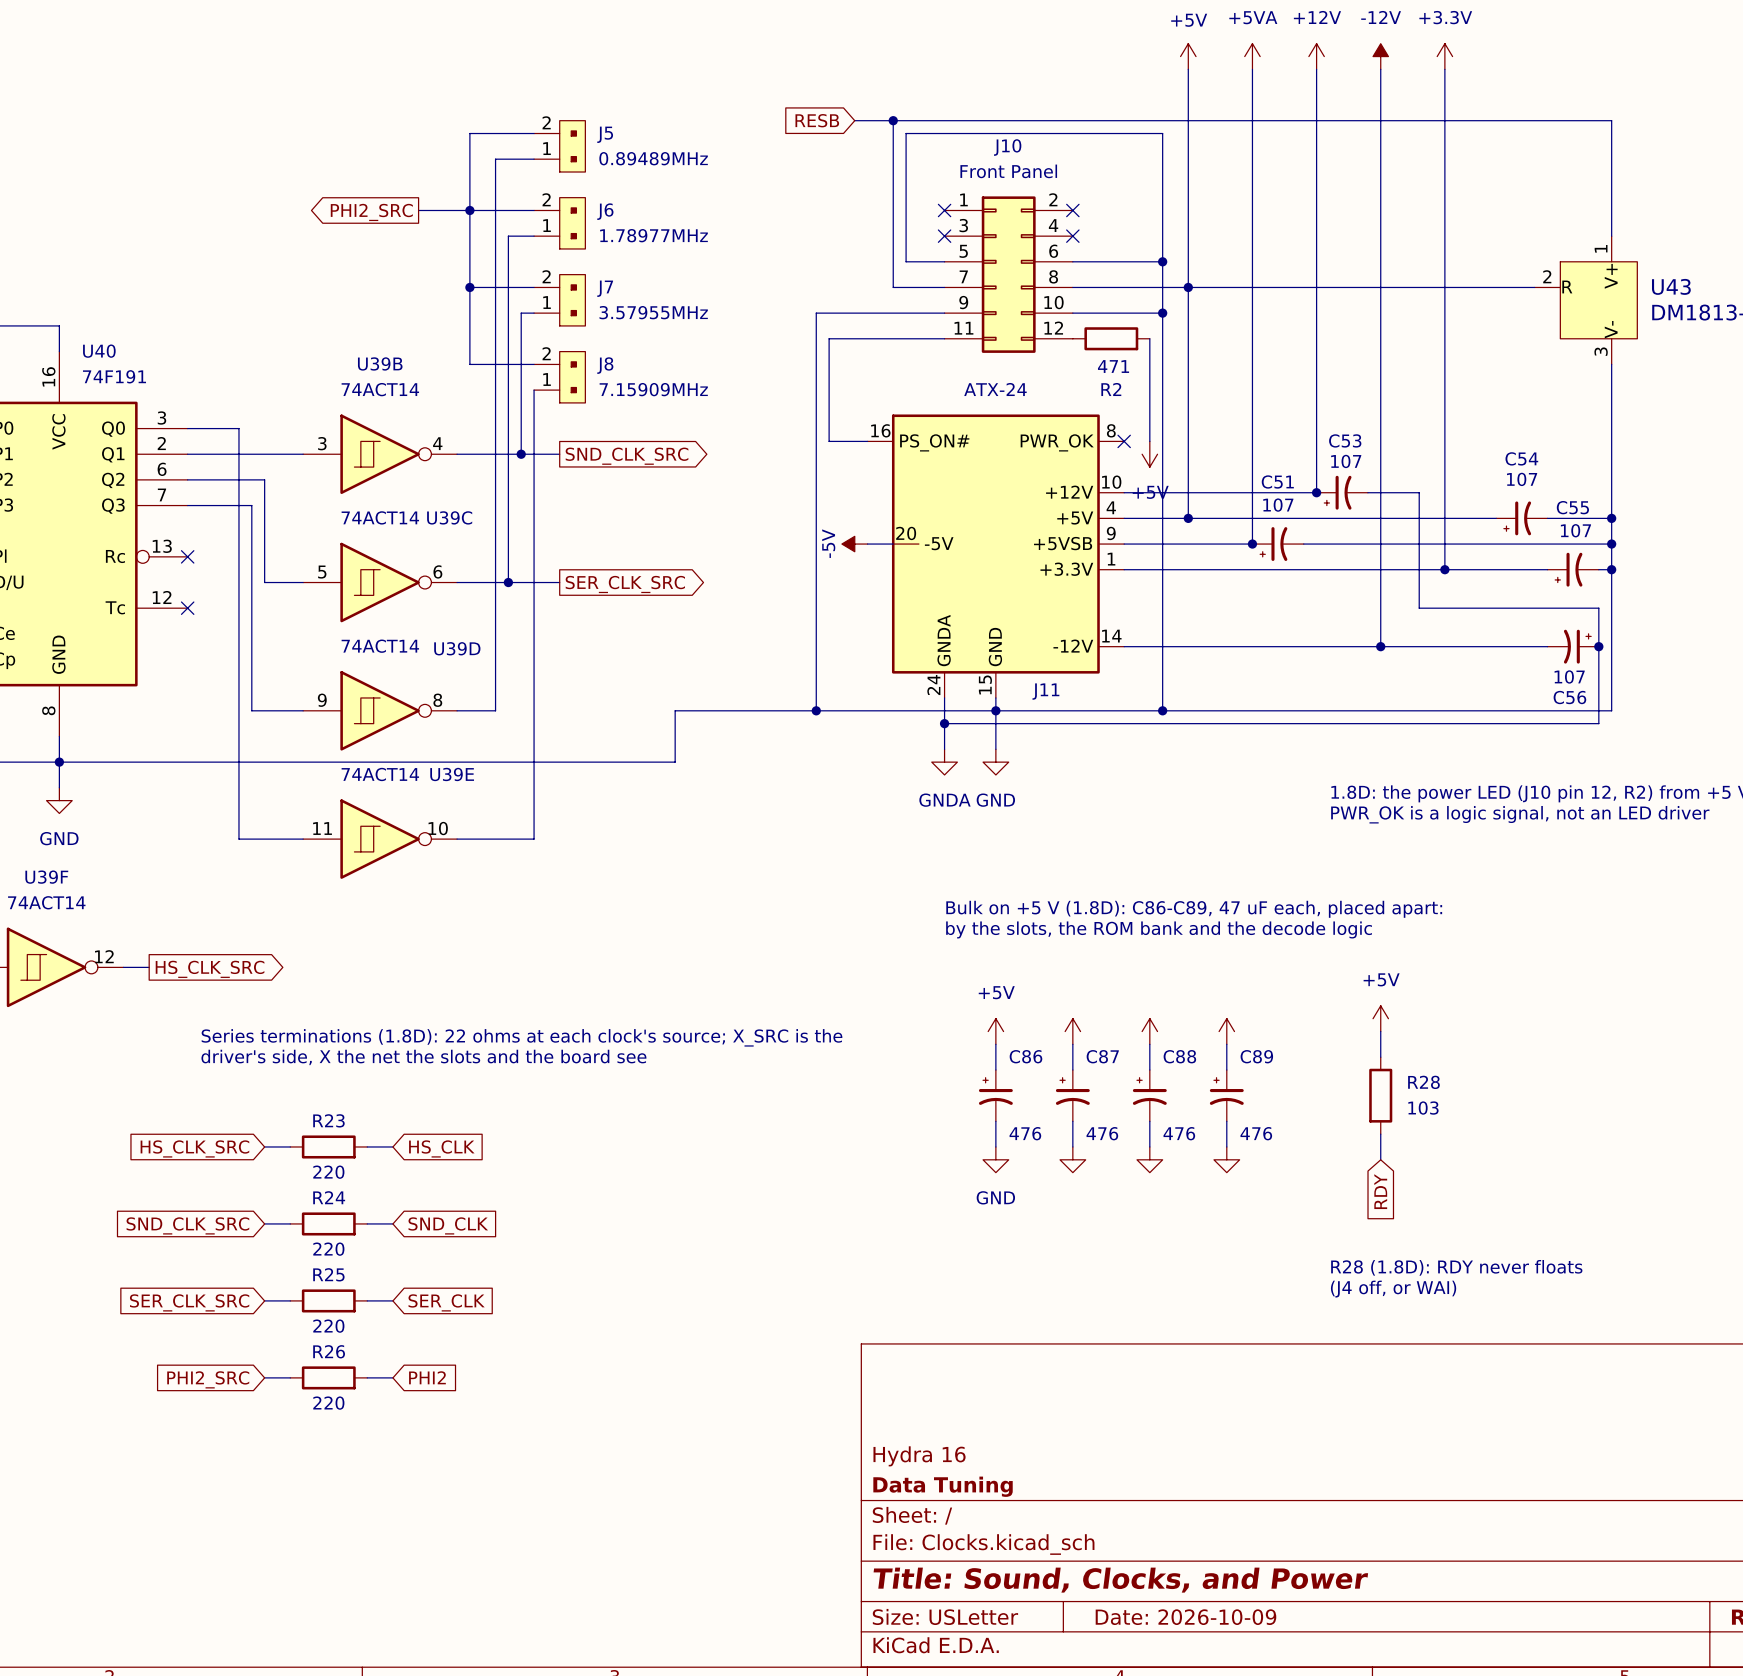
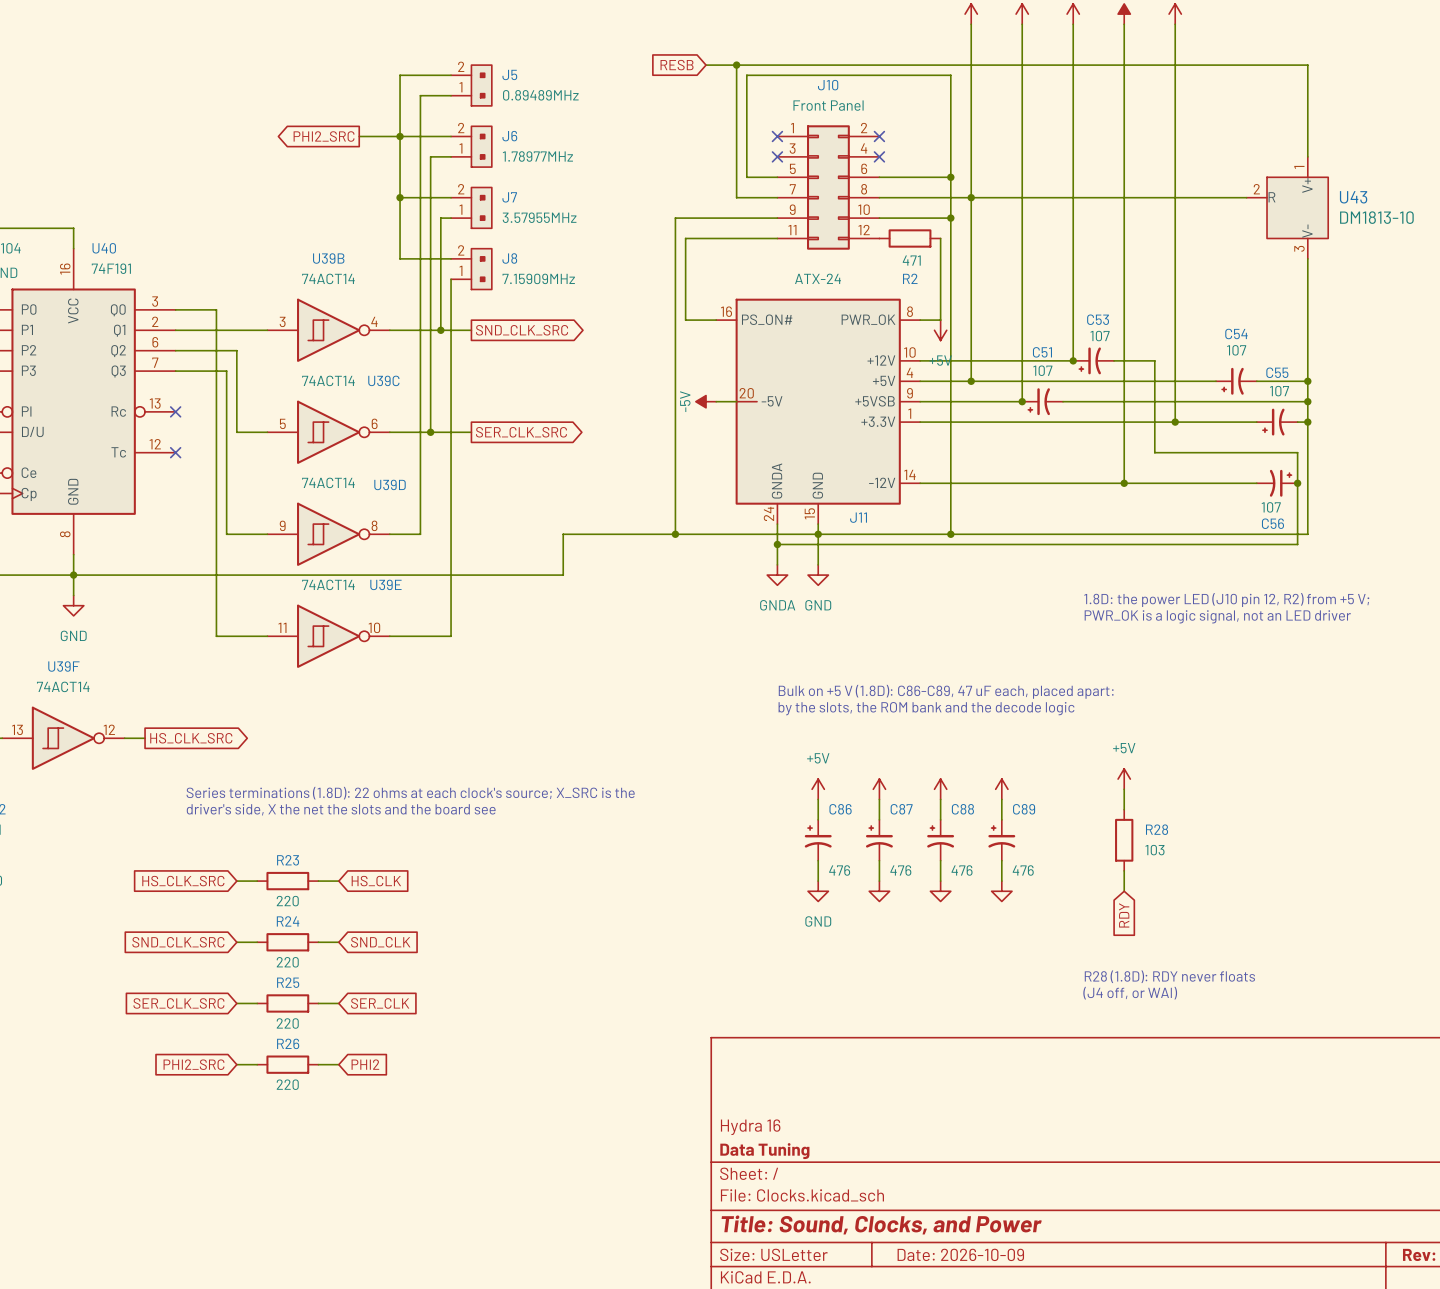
wire: none -> (920, 320) (940, 320)
no-connect mark: (1124, 441) -> none

